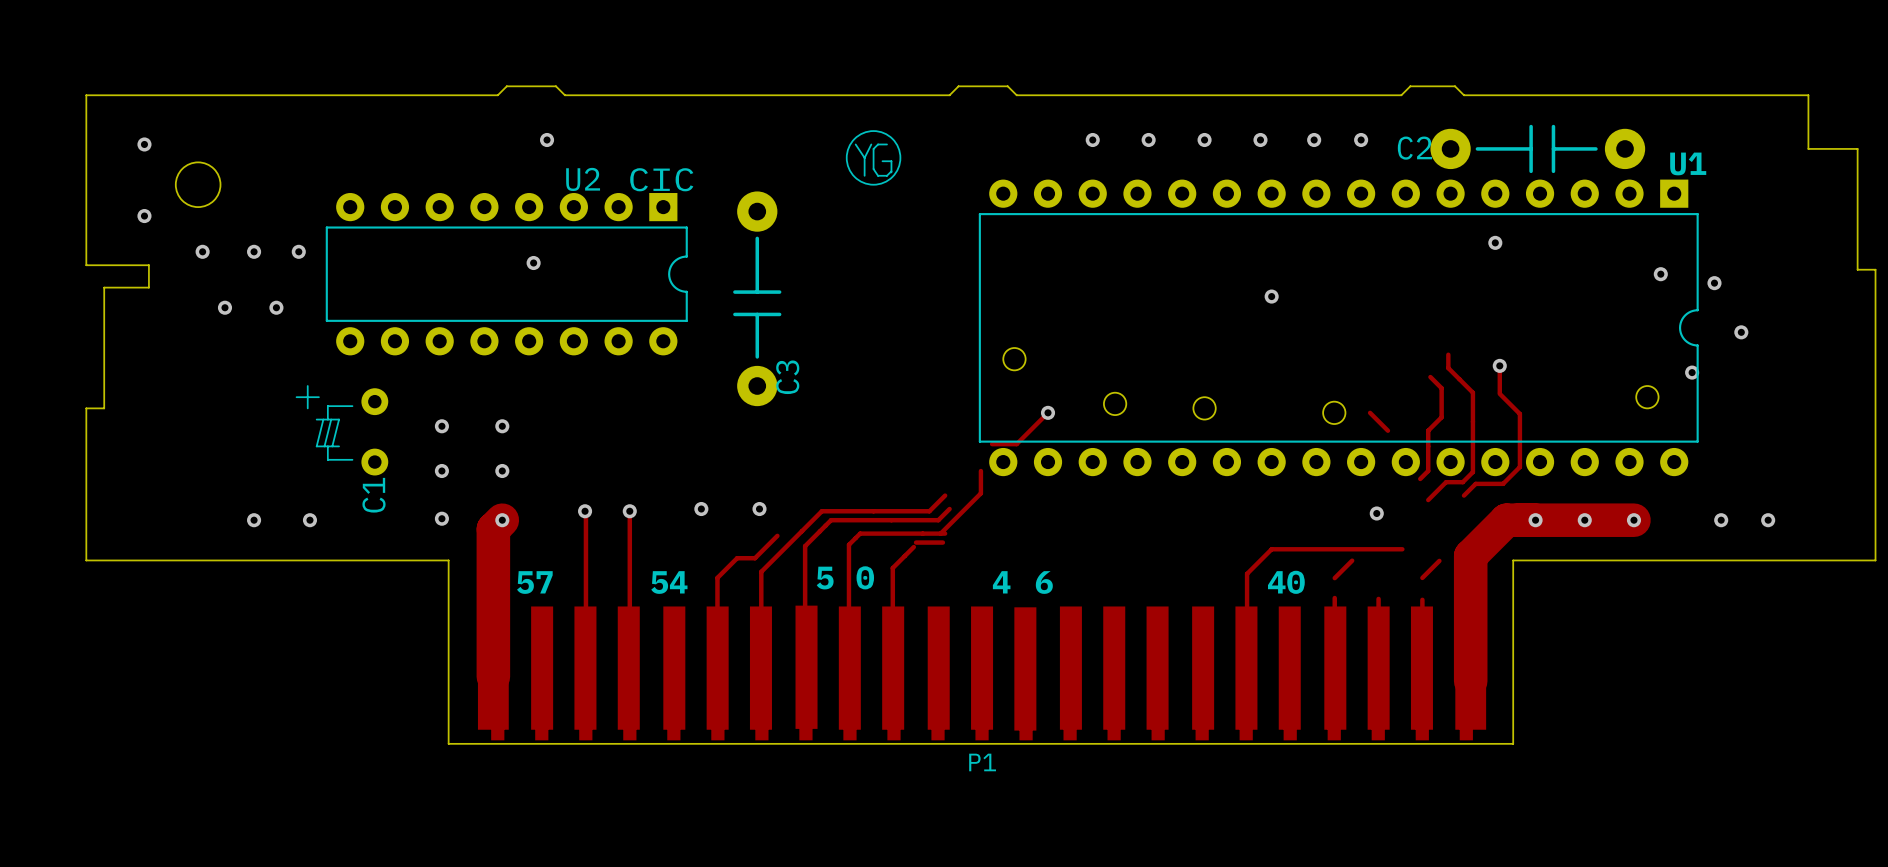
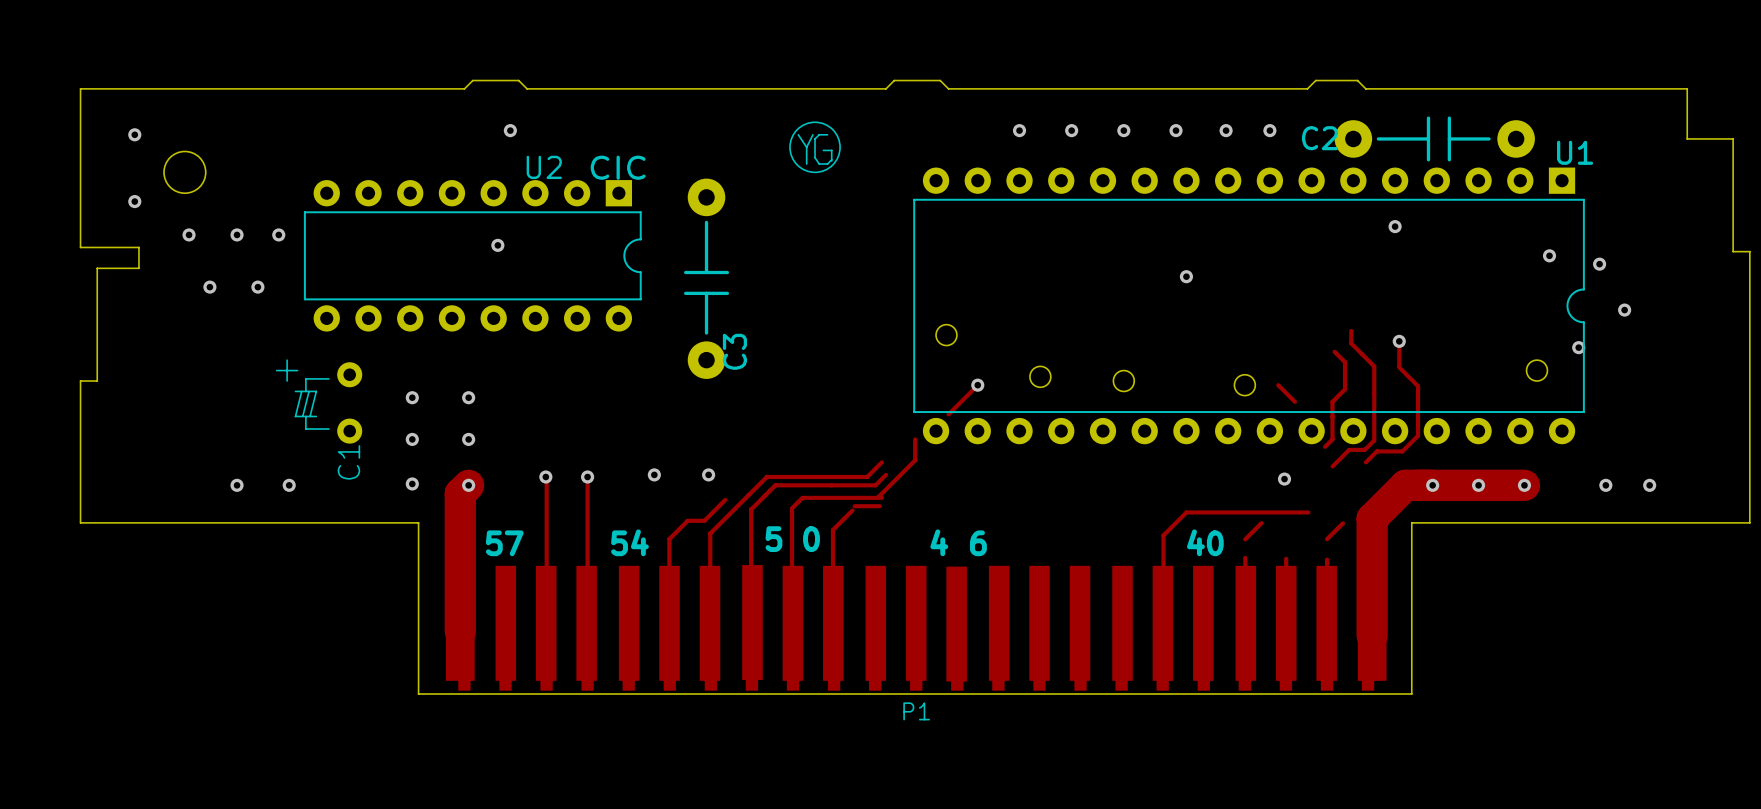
track: (992, 444) (1016, 444) -> none

